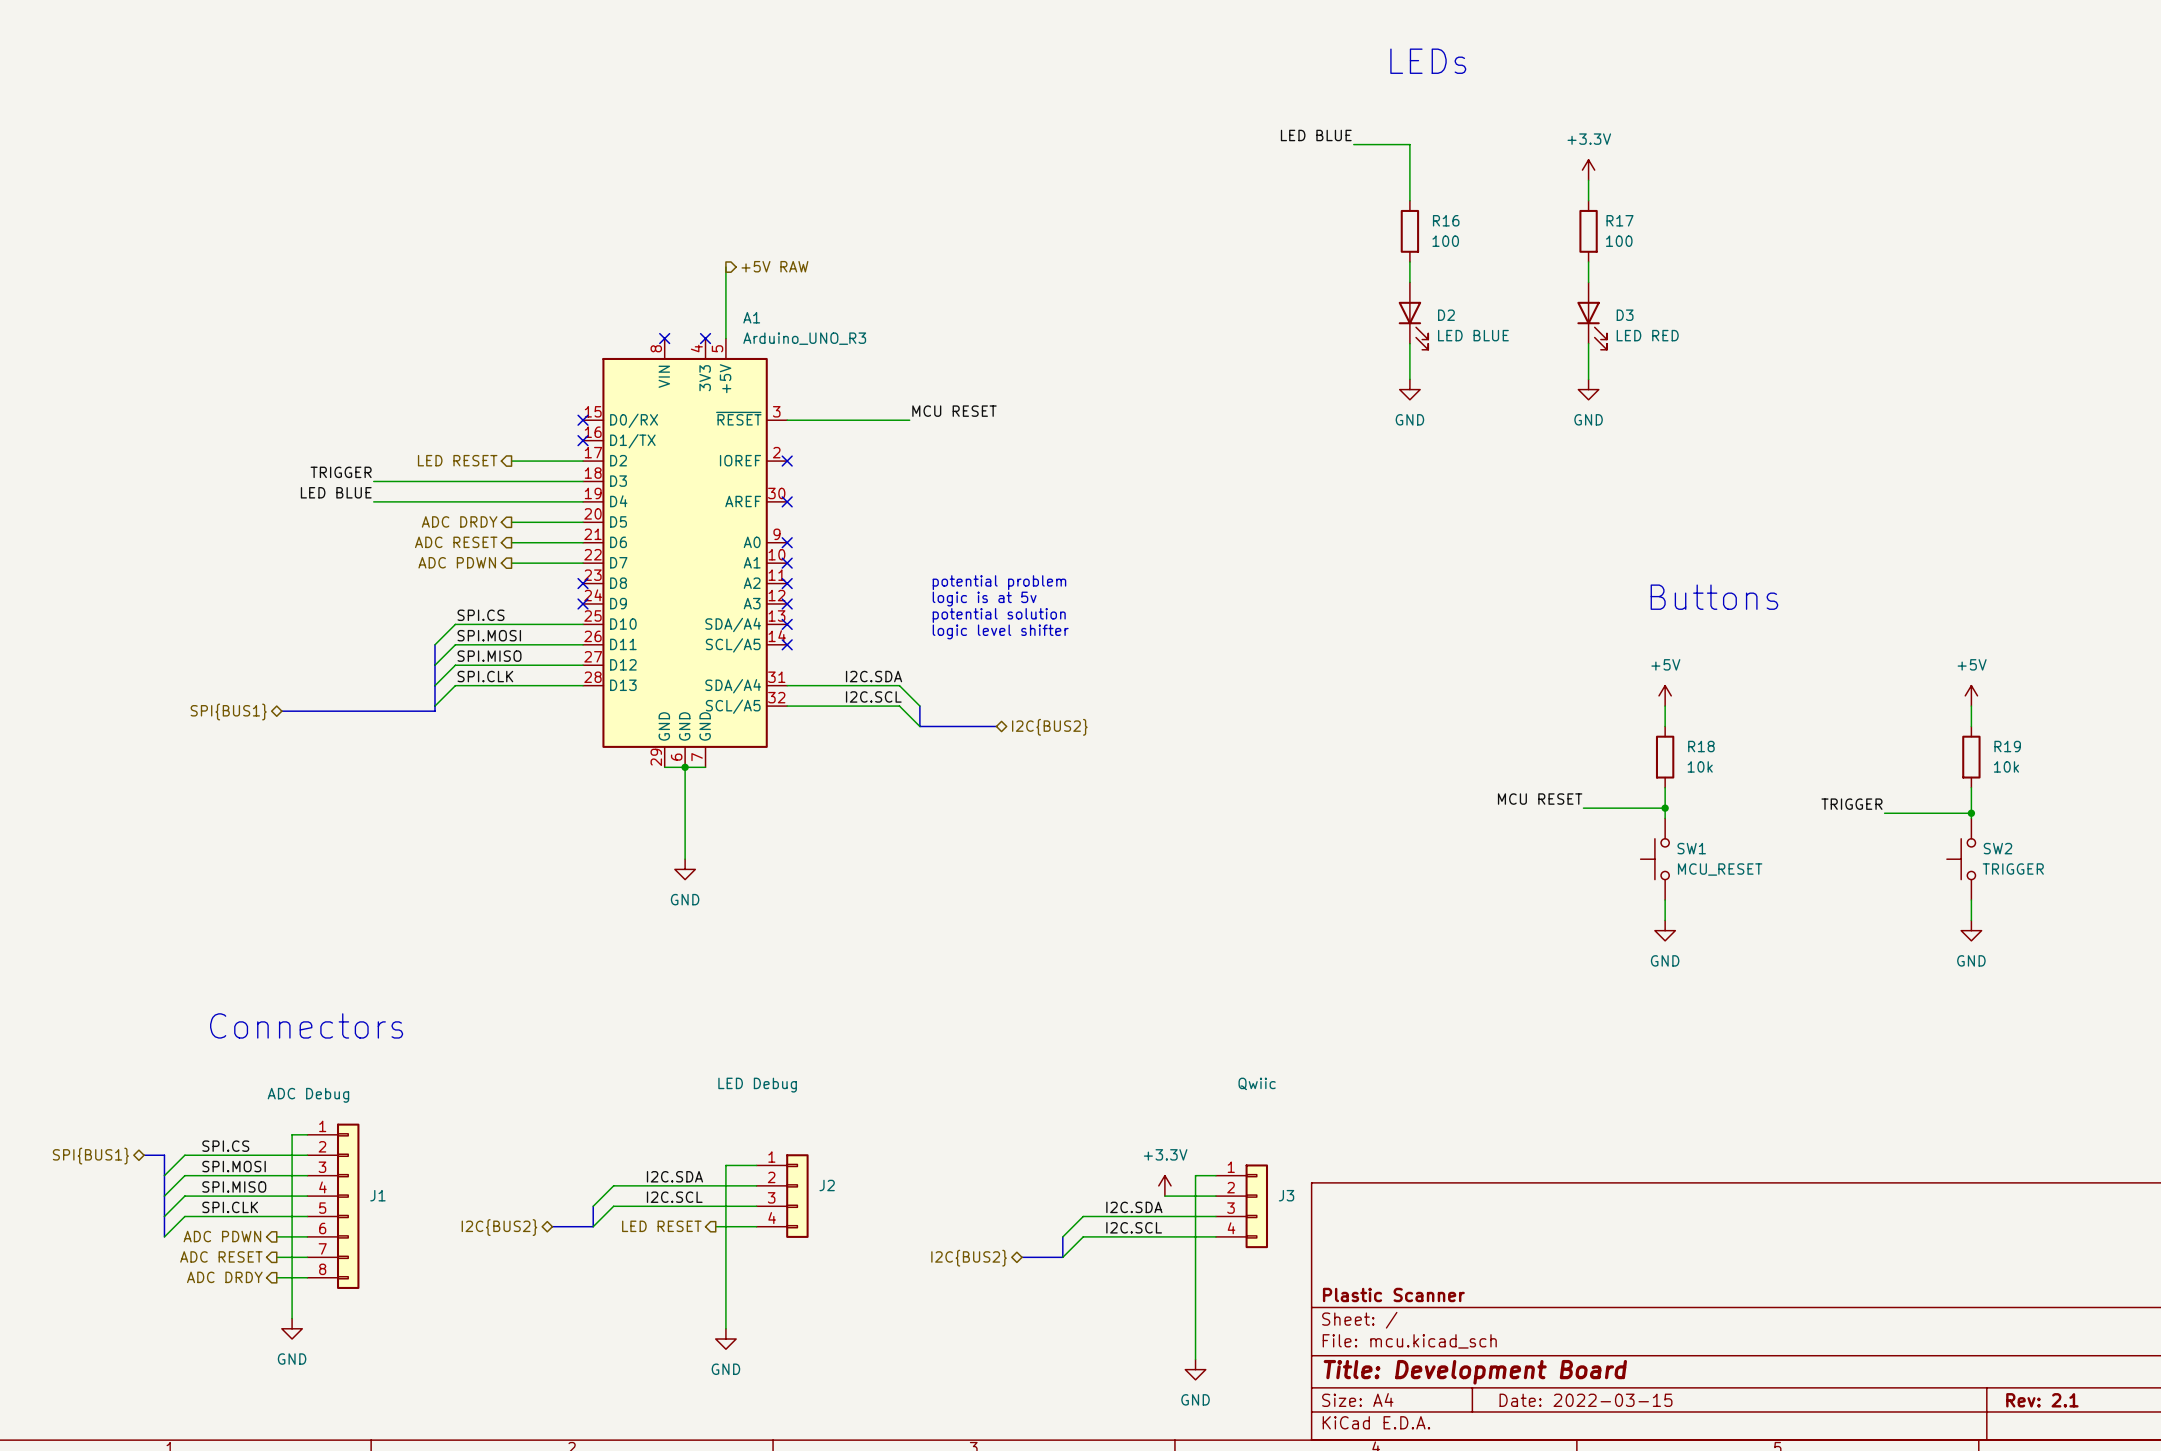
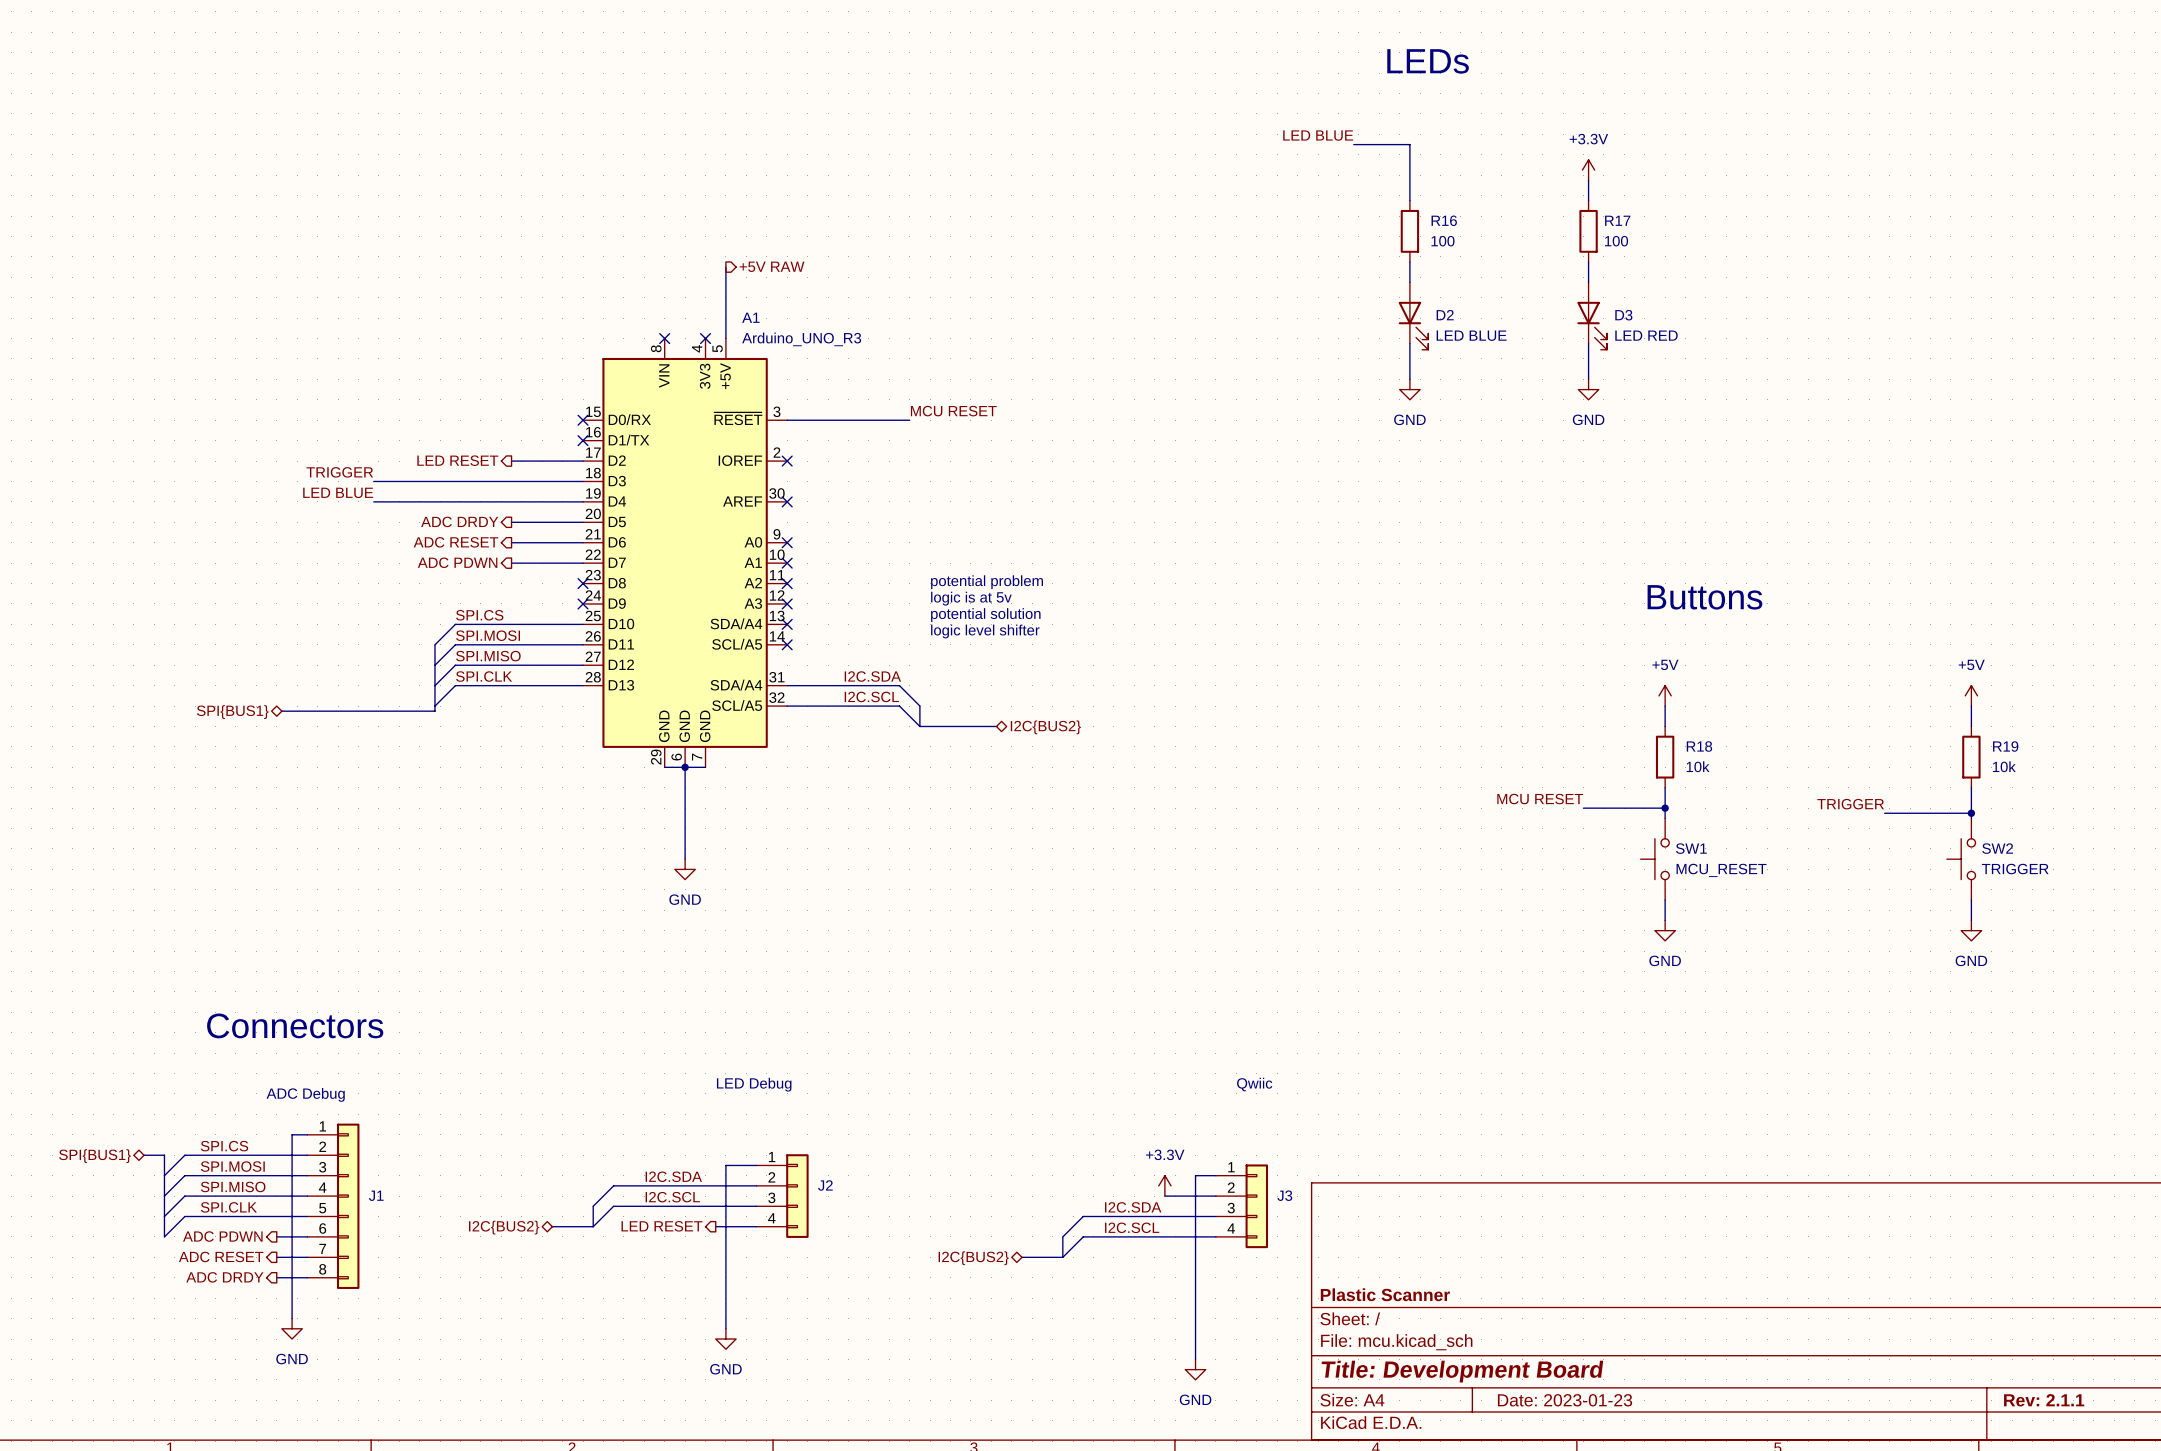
title block: Date: 2022-03-15 (1586, 1400) -> Date: 2023-01-23 (1565, 1400)
title block: Rev: 2.1 (2042, 1400) -> Rev: 2.1.1 (2044, 1400)

